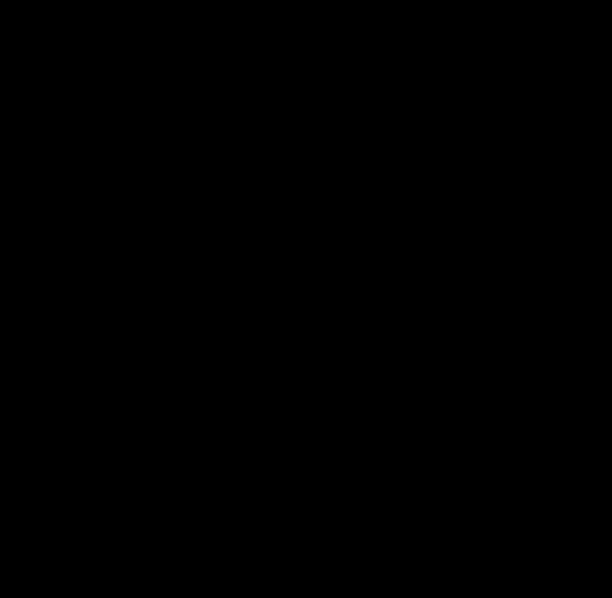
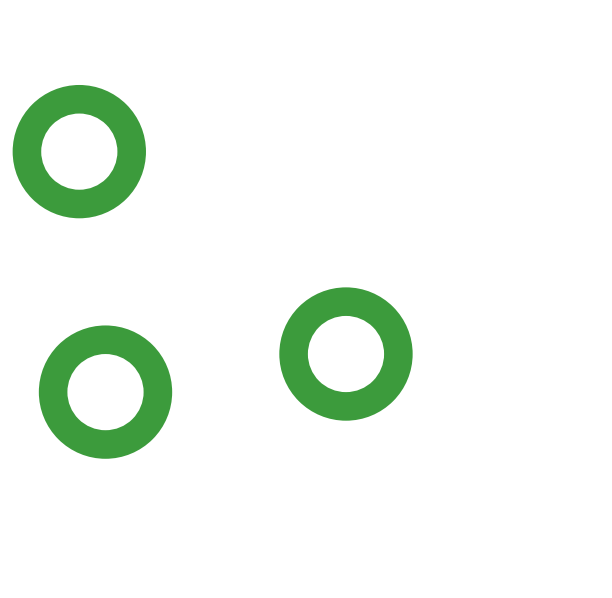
part: none -> (79, 151)
part: none -> (345, 354)
part: none -> (105, 392)

